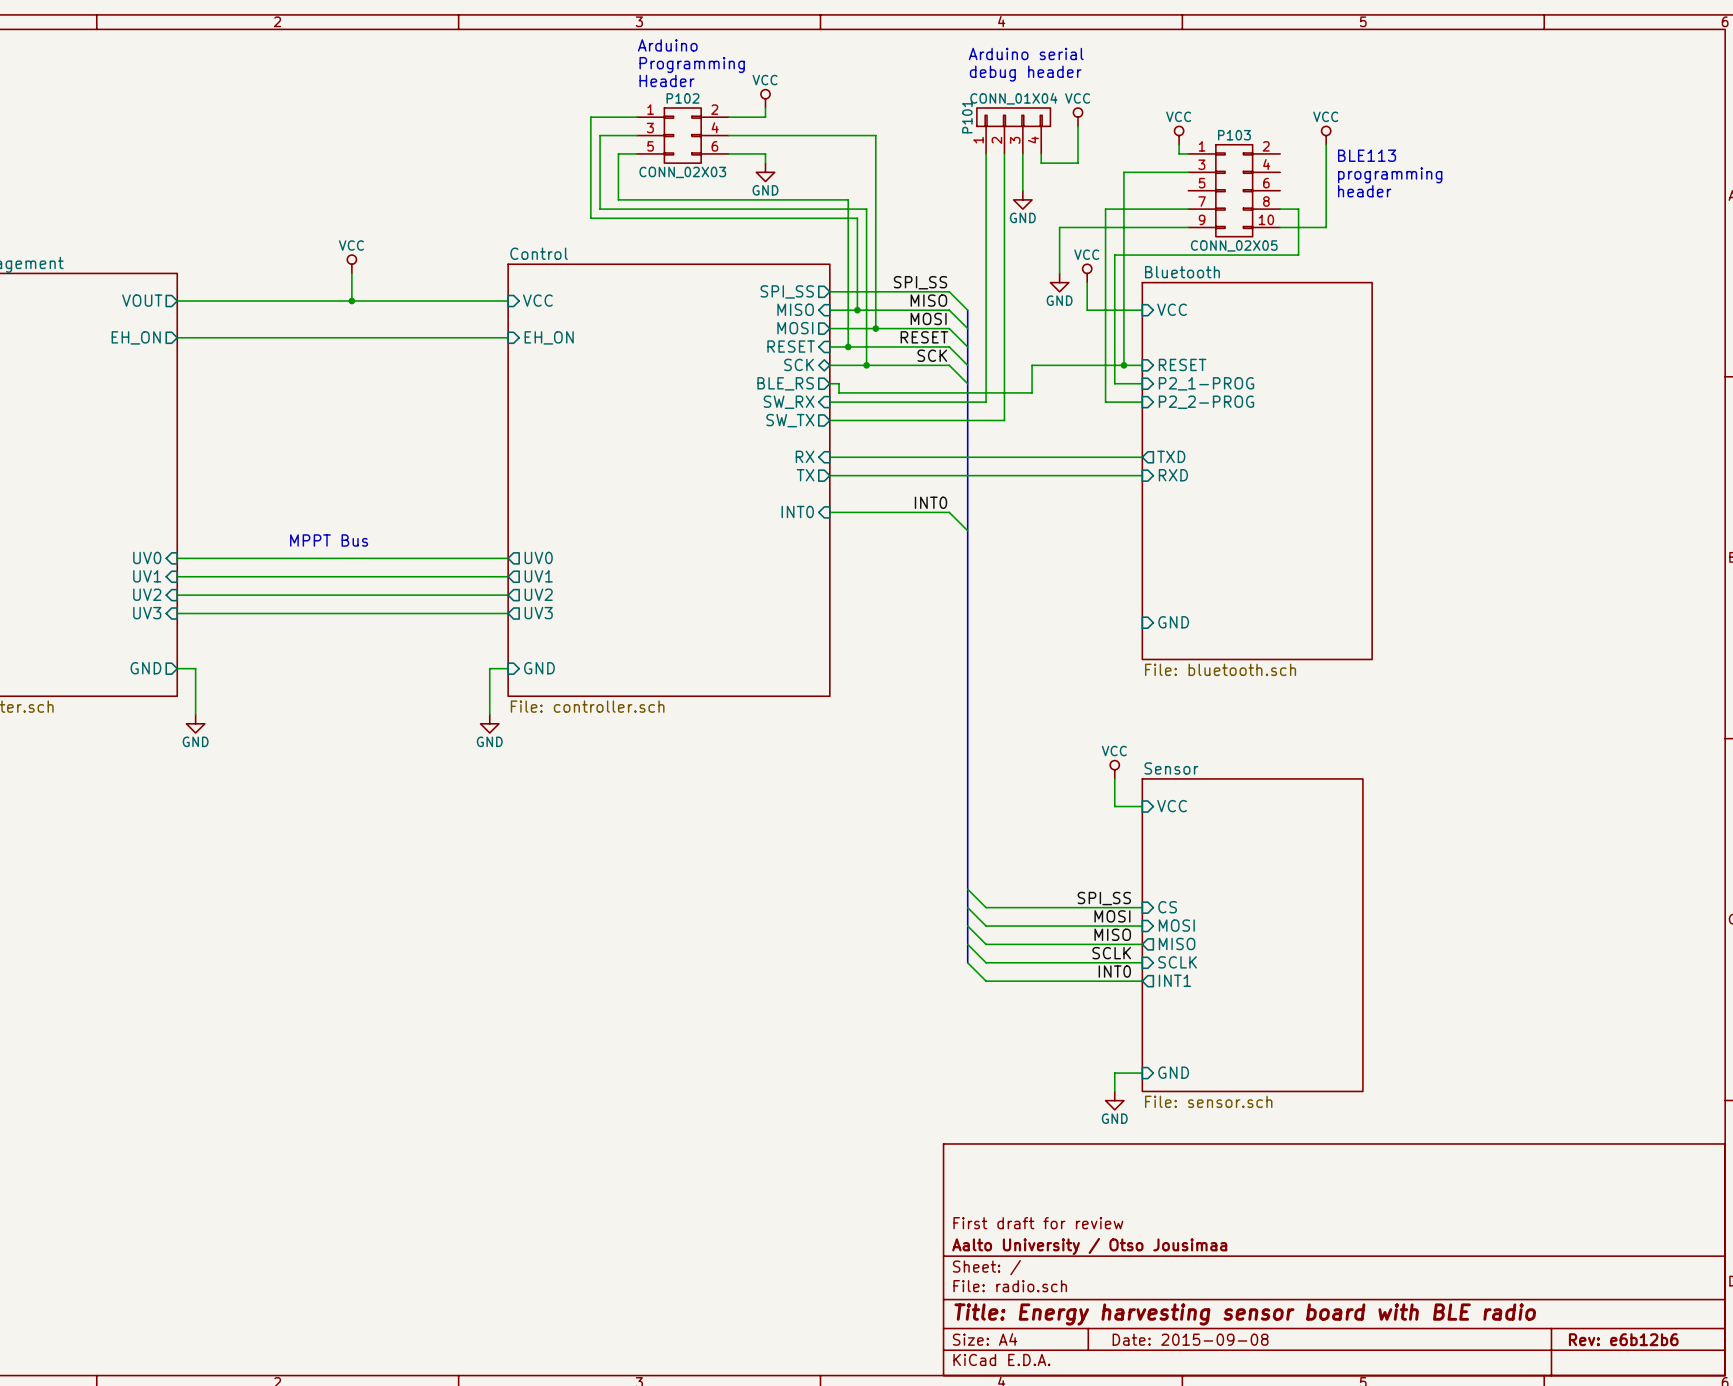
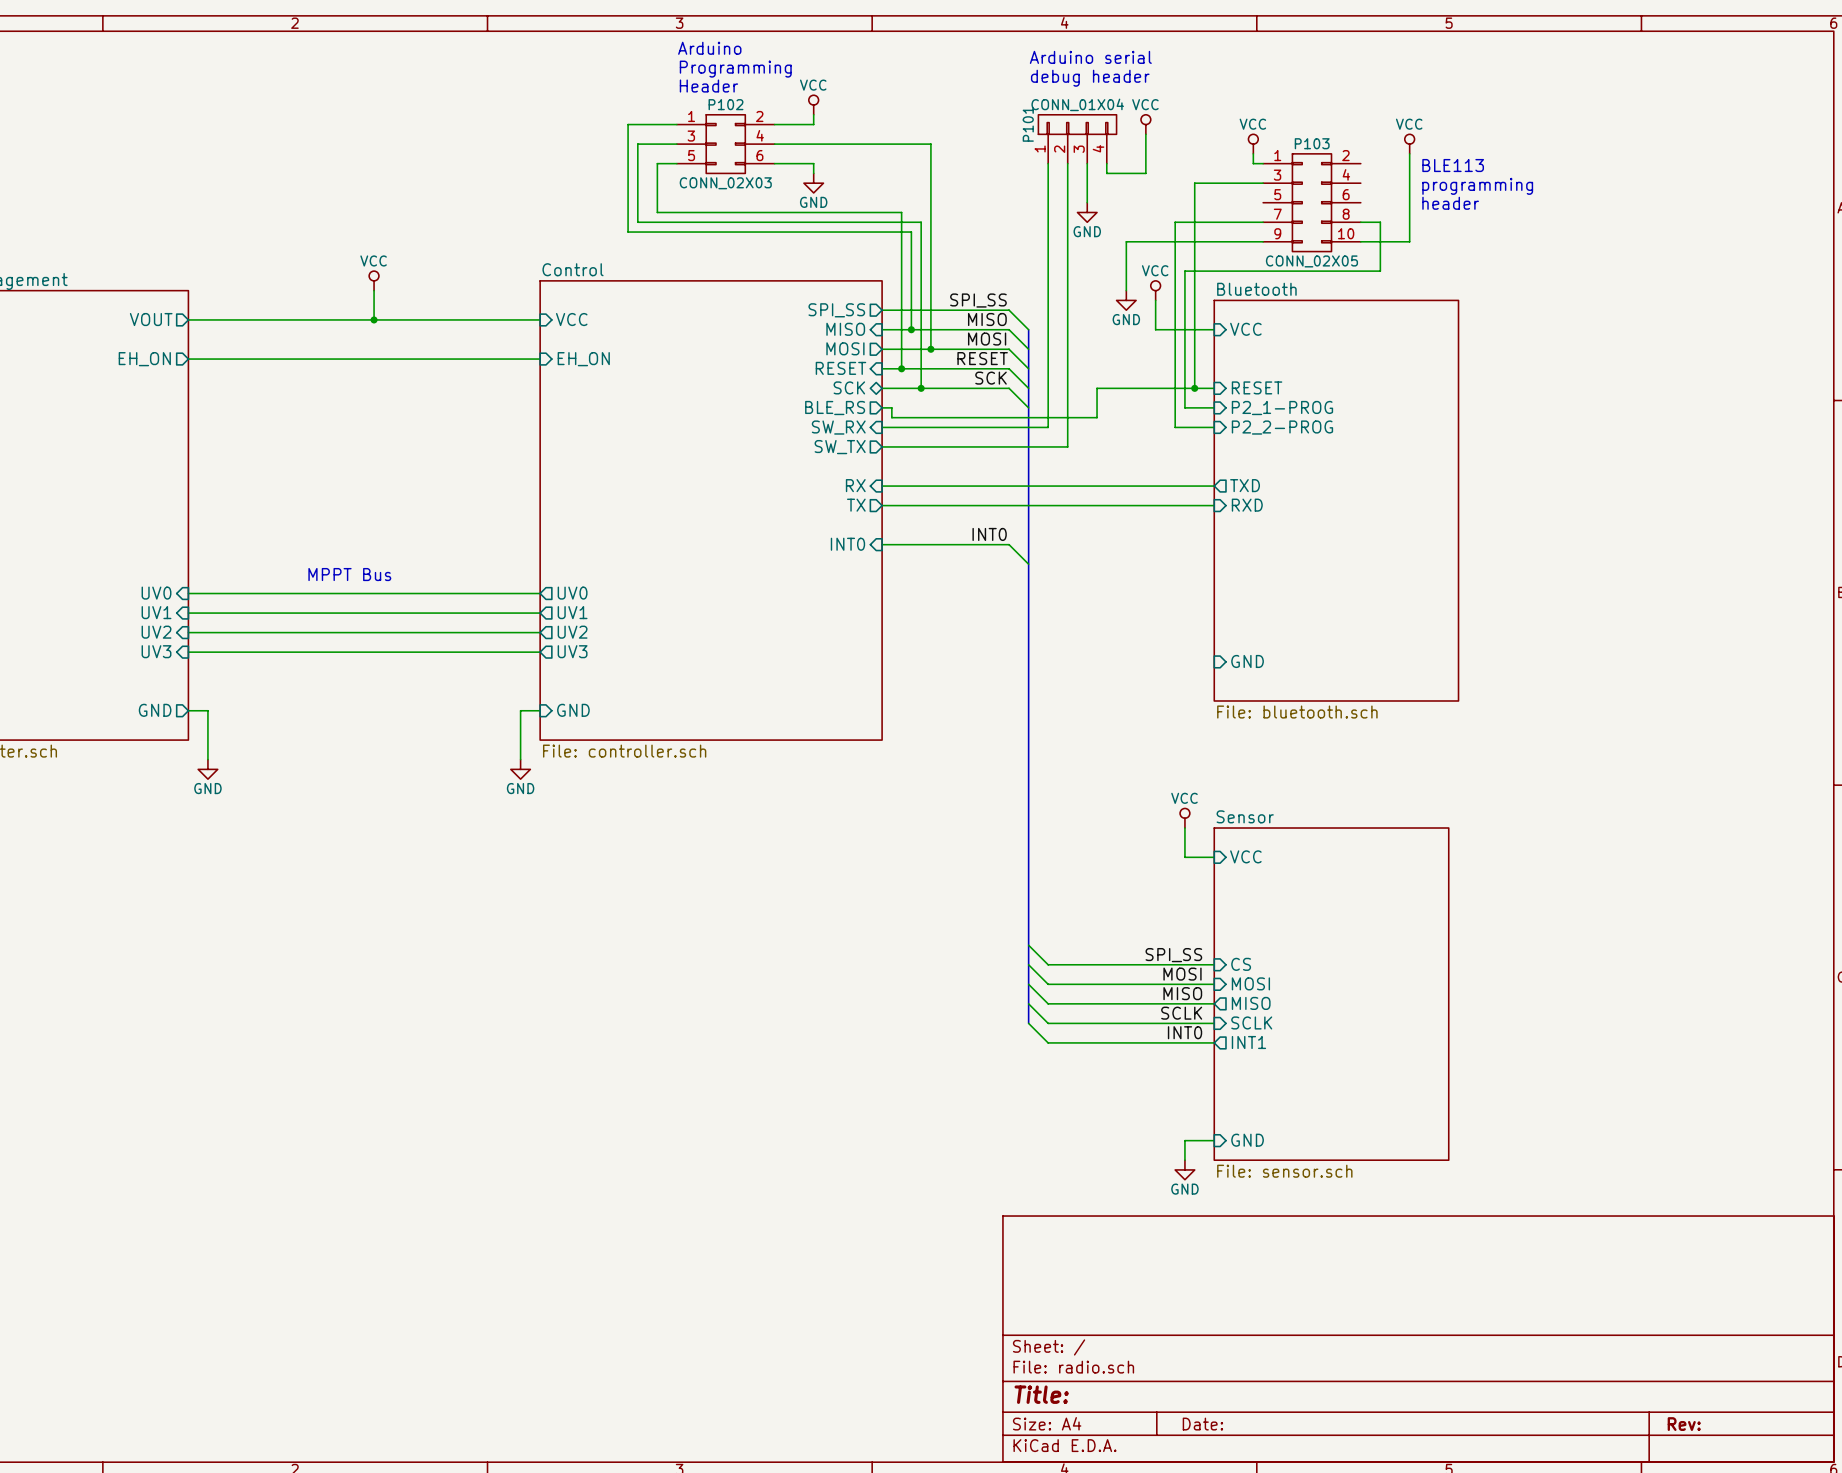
title block: First draft for review (1038, 1223) -> none
title block: Aalto University / Otso Jousimaa (1089, 1246) -> none
title block: Title: Energy harvesting sensor board with BLE radio (1245, 1314) -> Title: (1041, 1394)
title block: Date: 2015-09-08 (1190, 1339) -> Date: (1202, 1424)
title block: Rev: e6b12b6 (1623, 1339) -> Rev: (1684, 1424)

